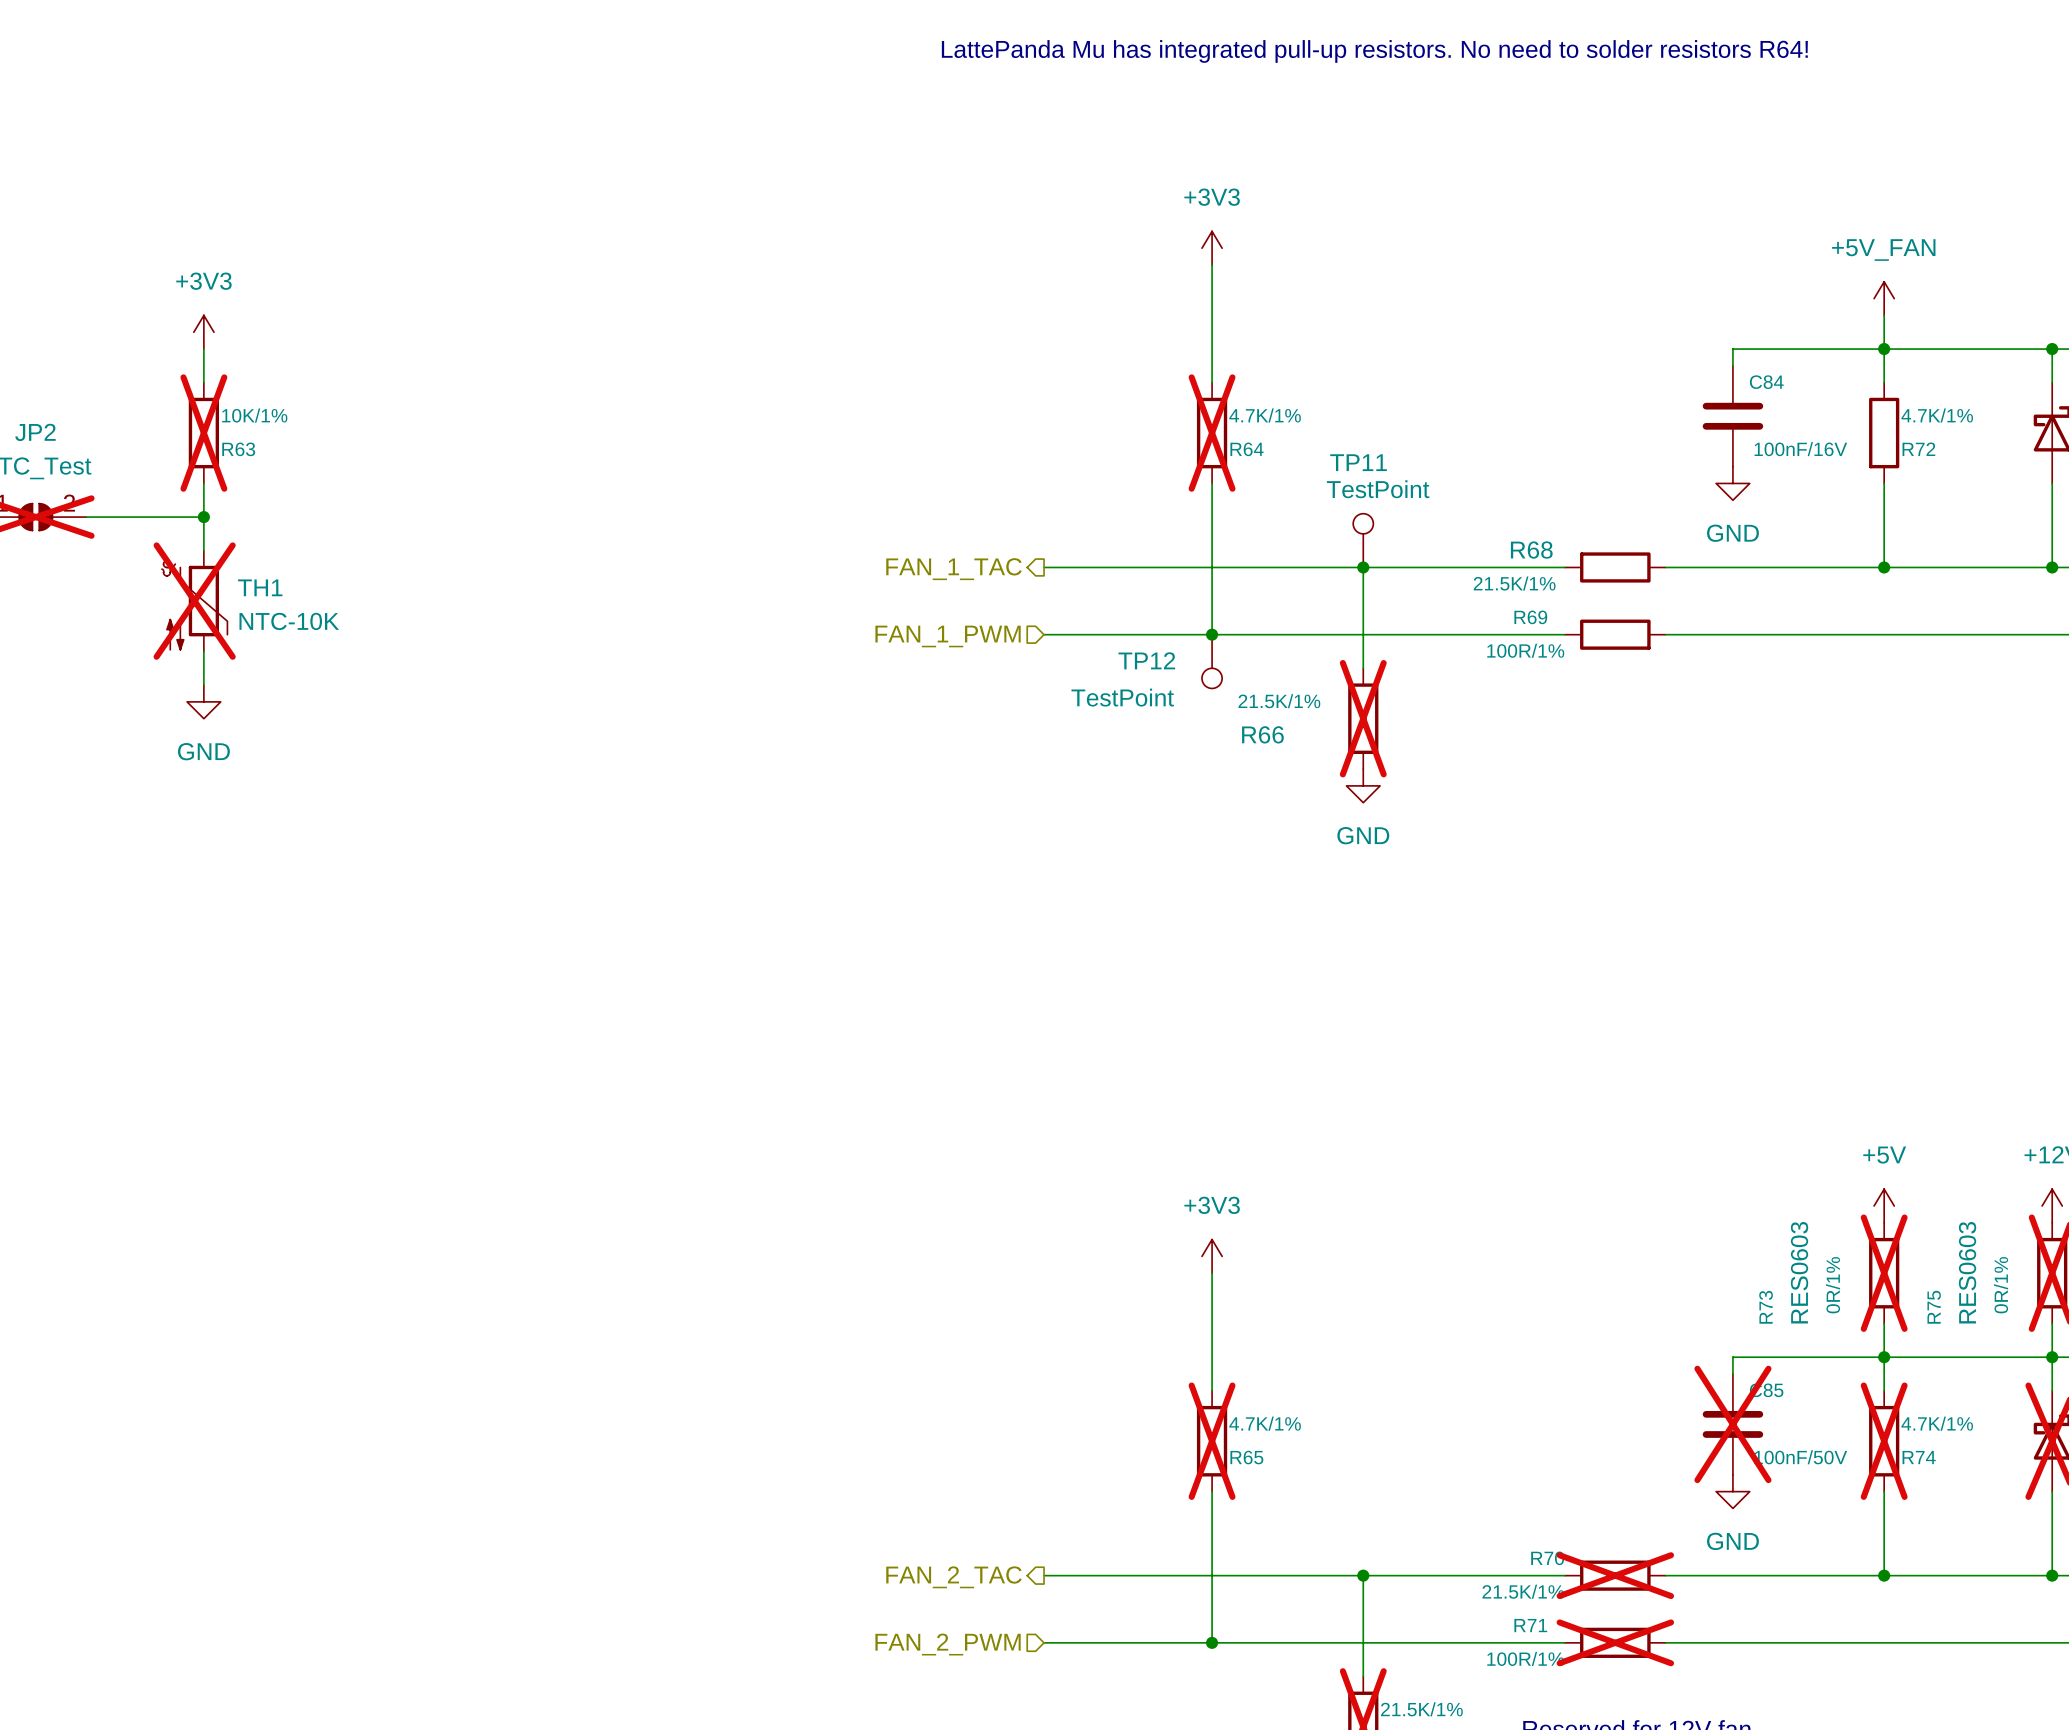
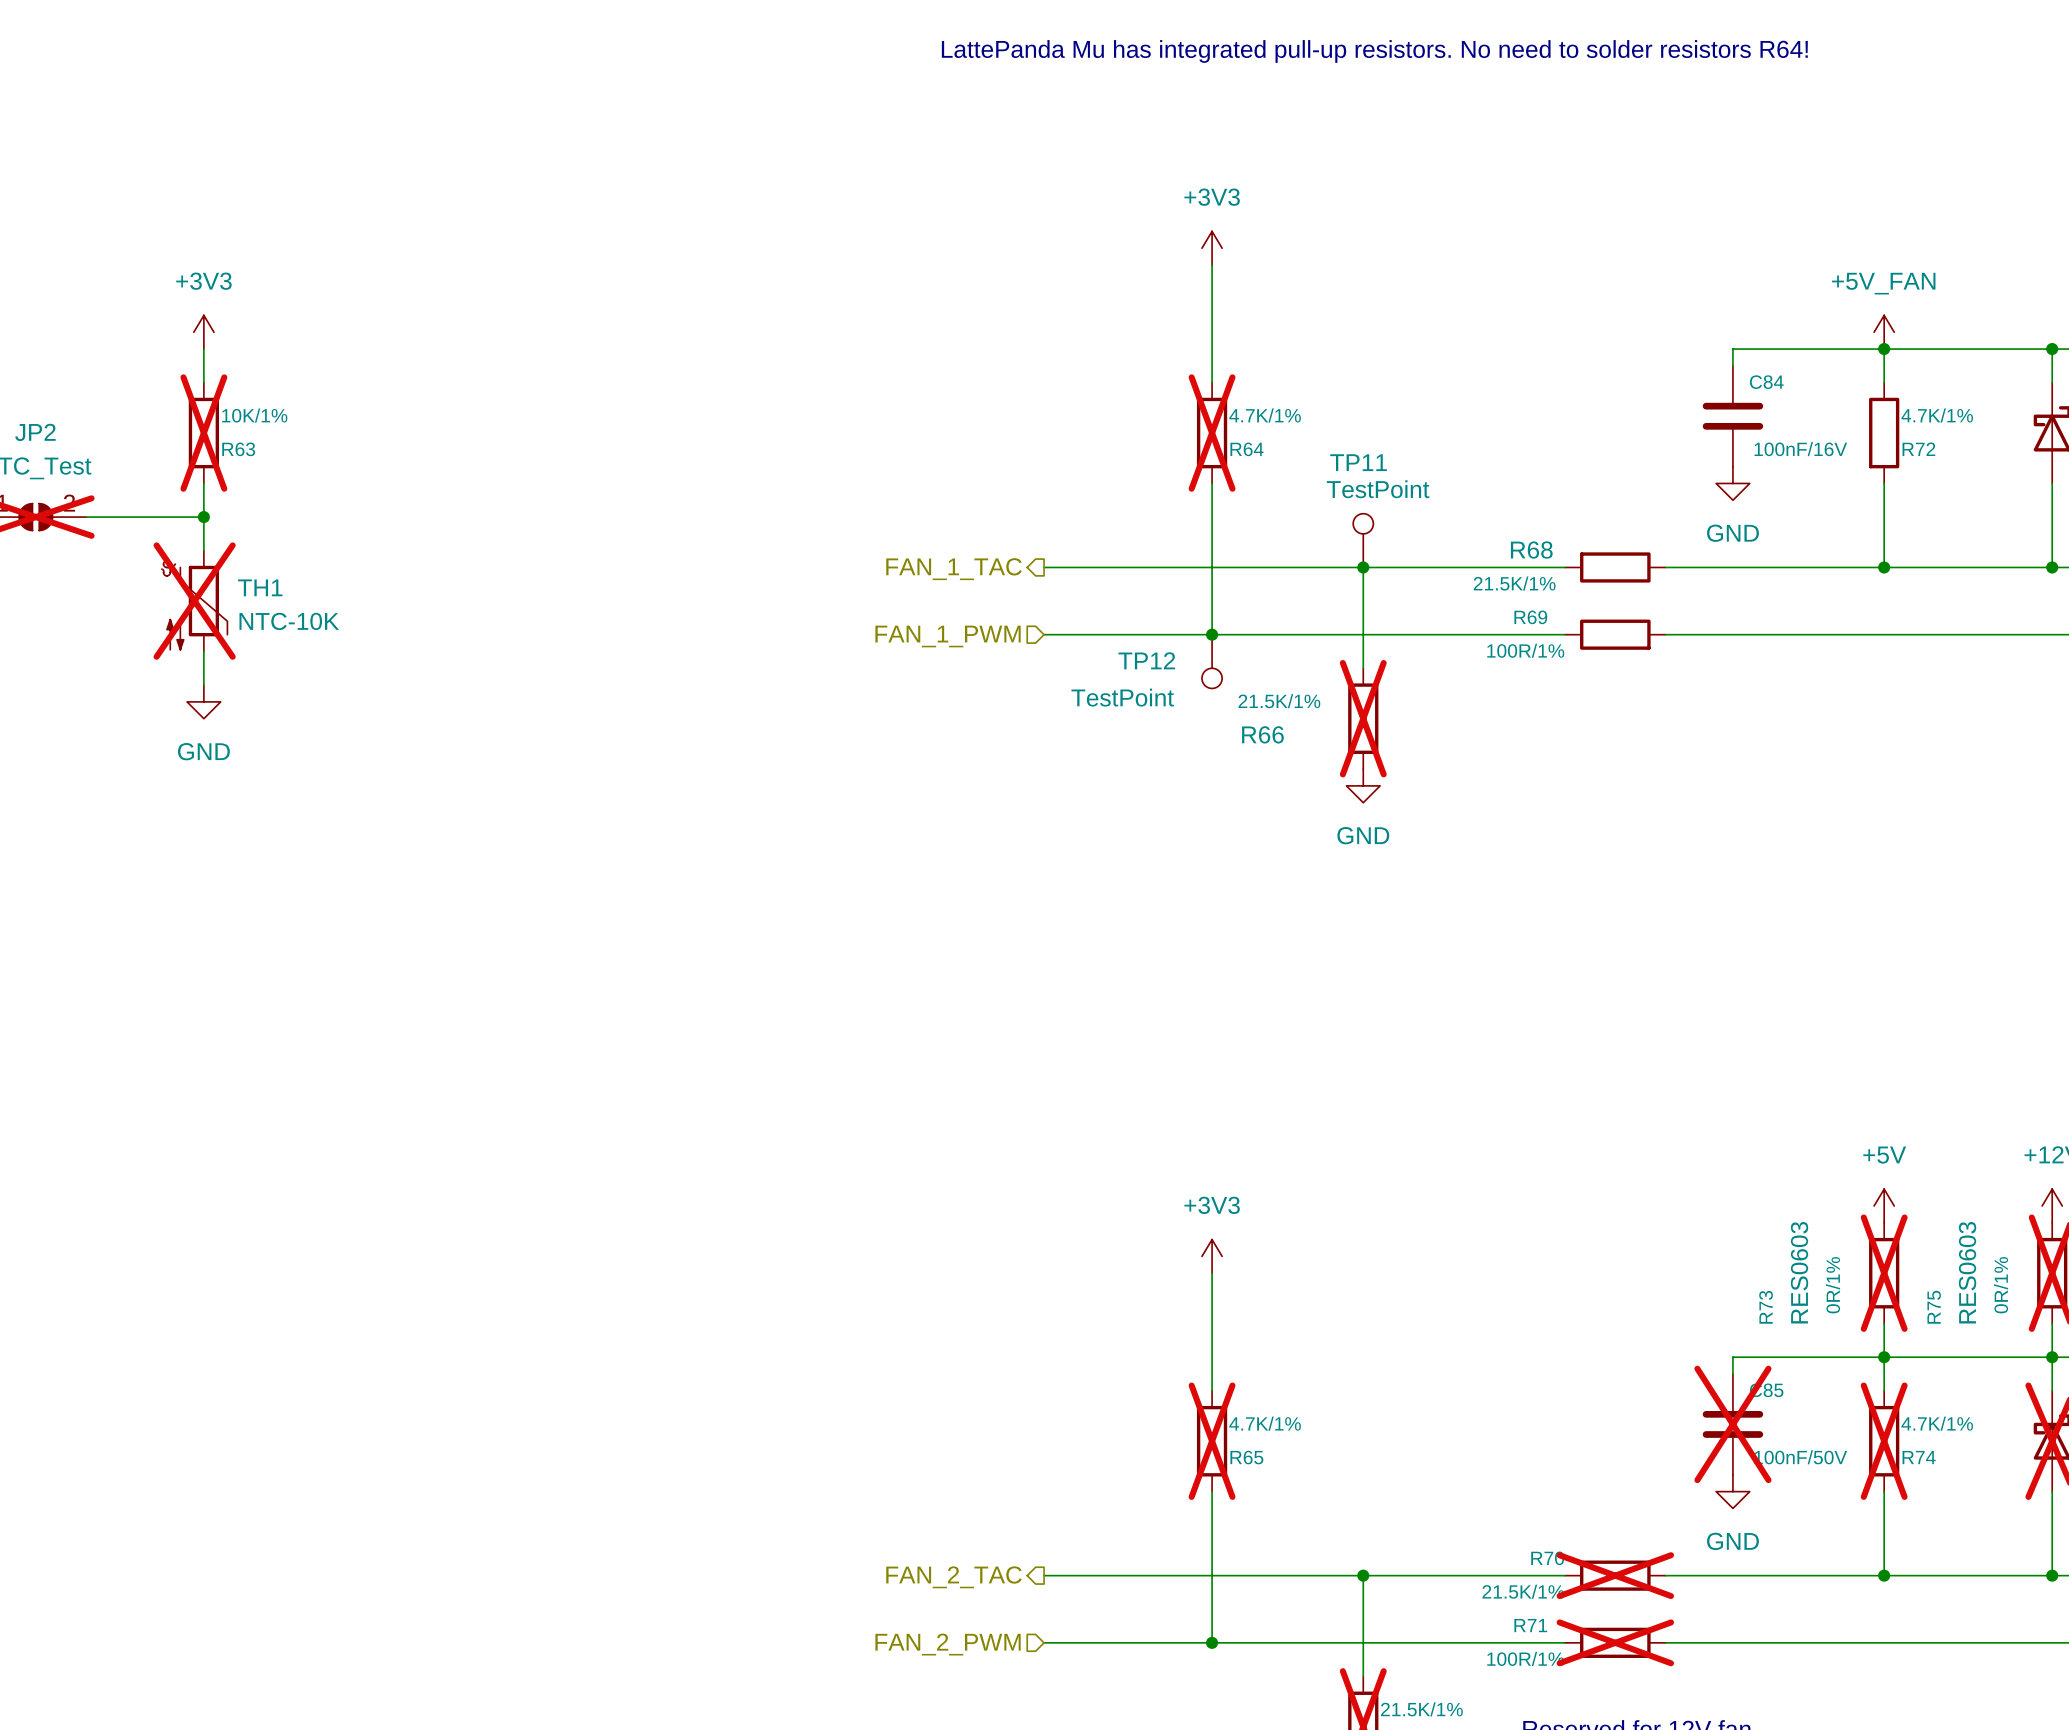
power symbol position: +5V_FAN (1884, 298) -> +5V_FAN (1884, 332)

